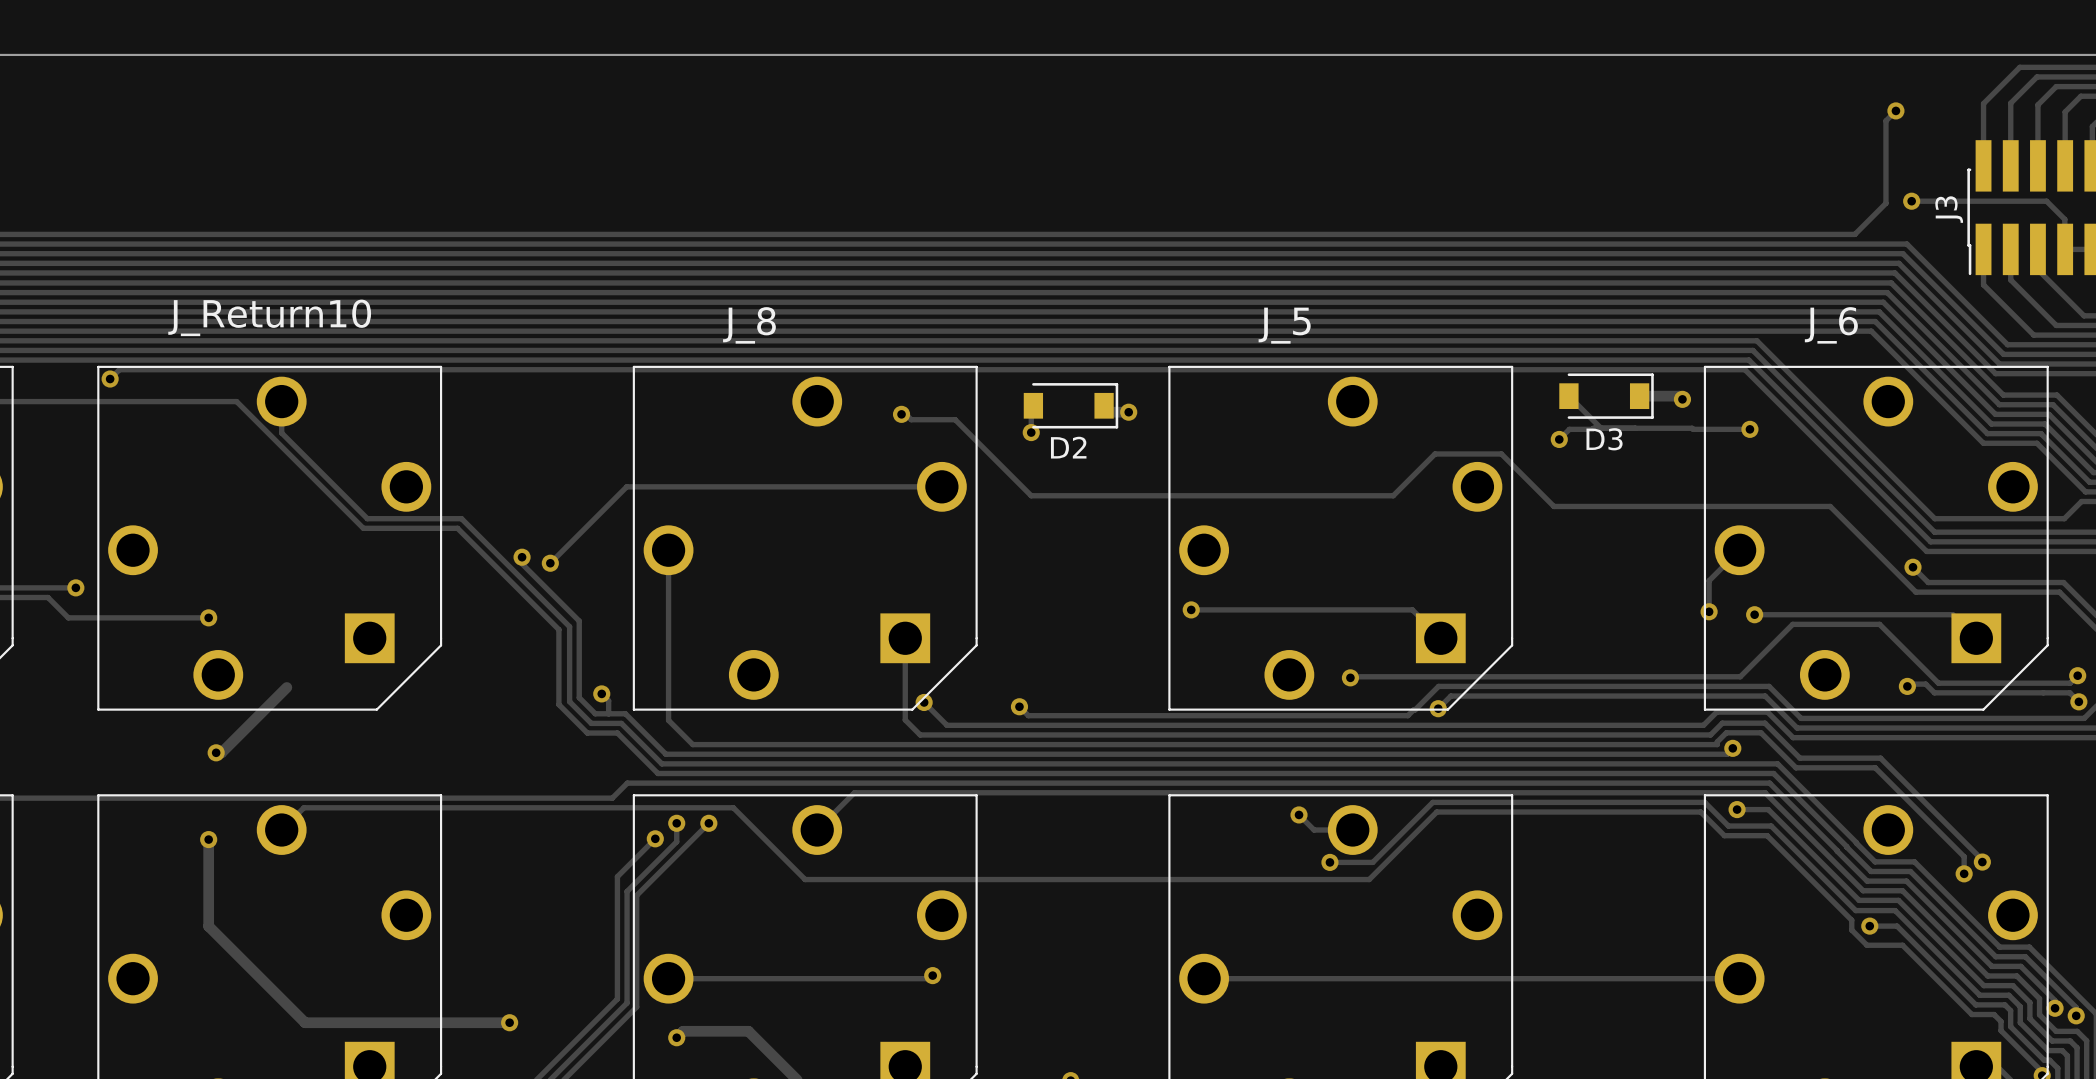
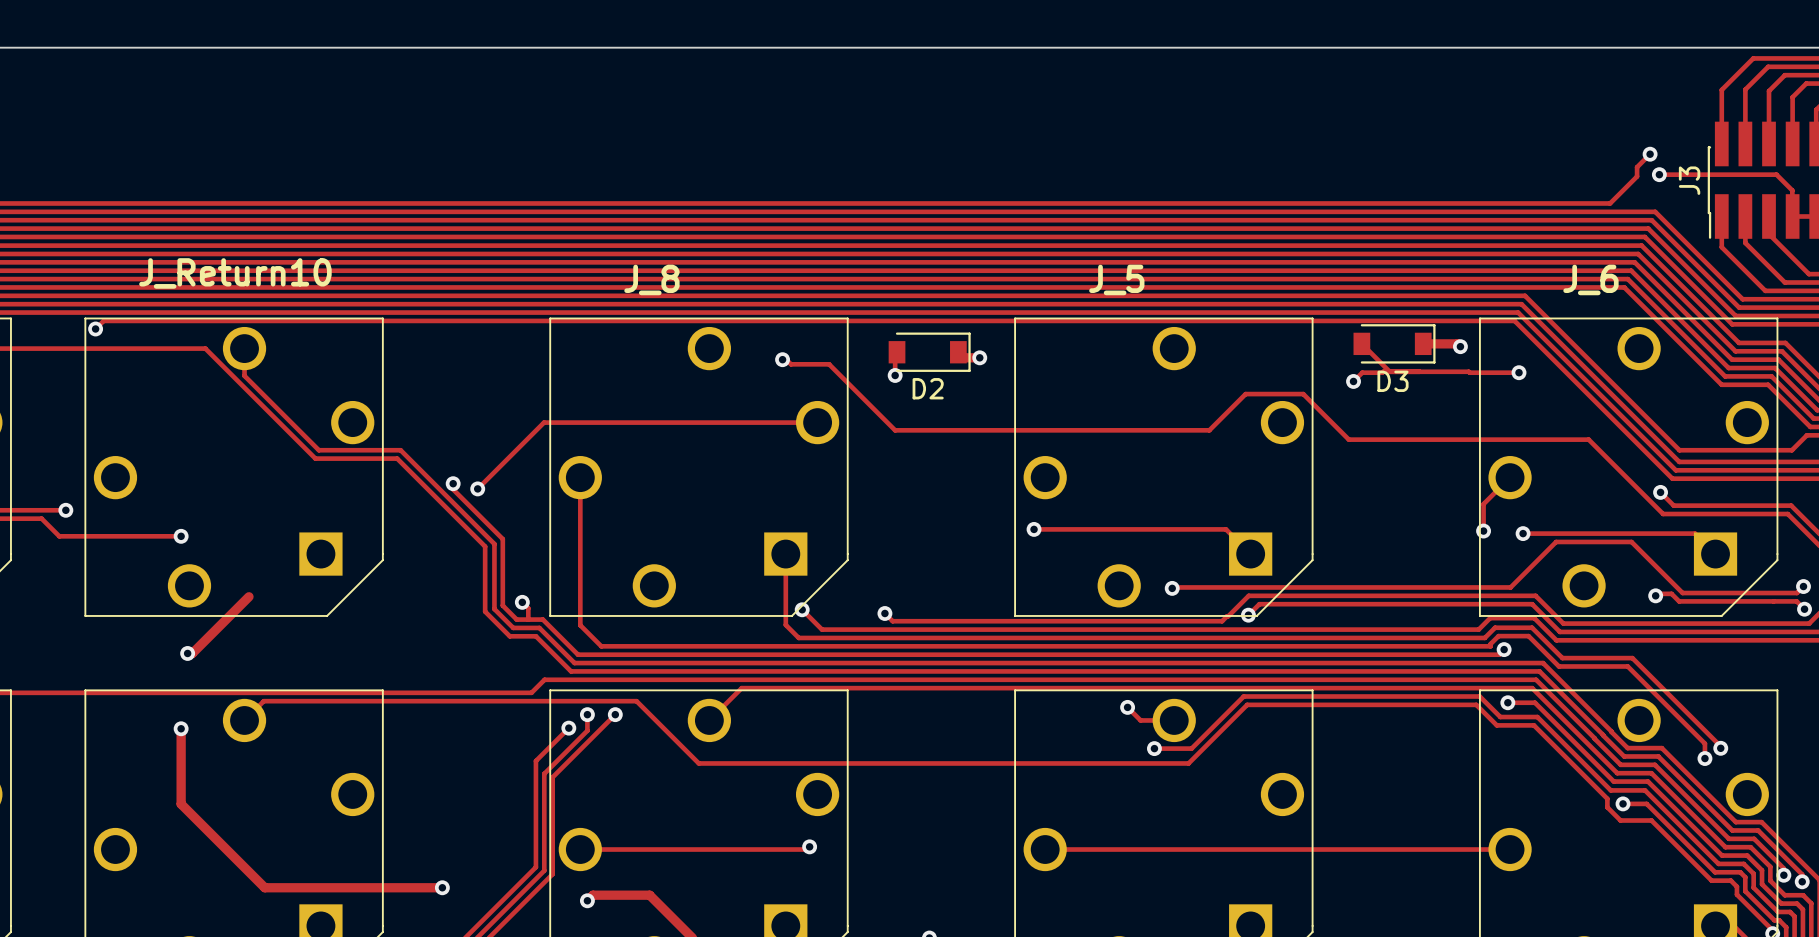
track: (1895, 110) (1885, 120) (1885, 192) -> (1650, 154) (1637, 167)
via position: (1895, 110) -> (1650, 154)

